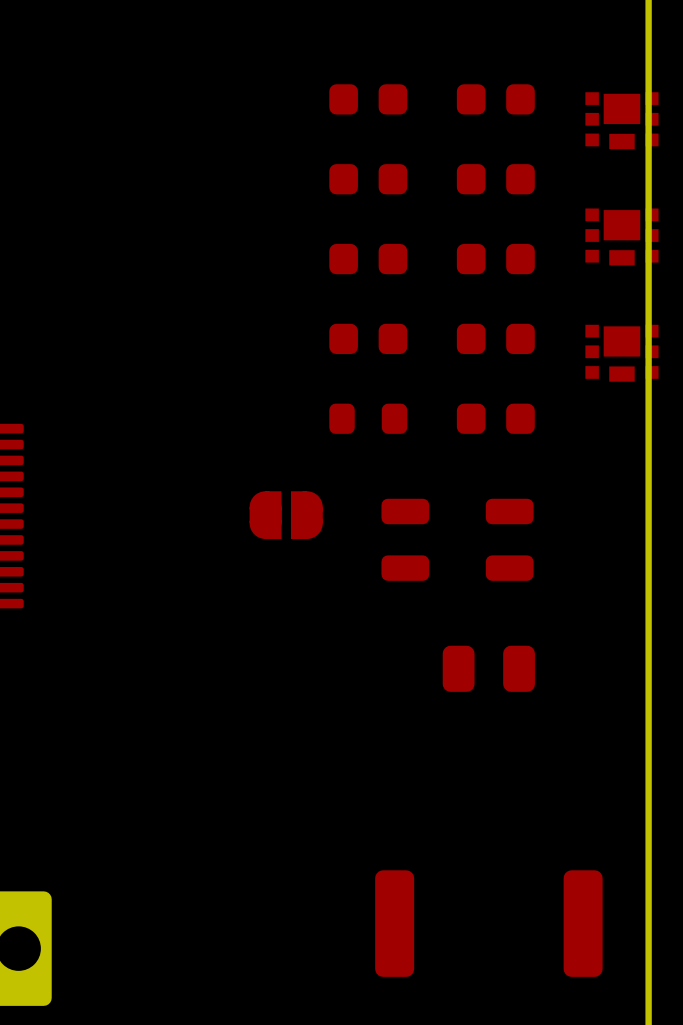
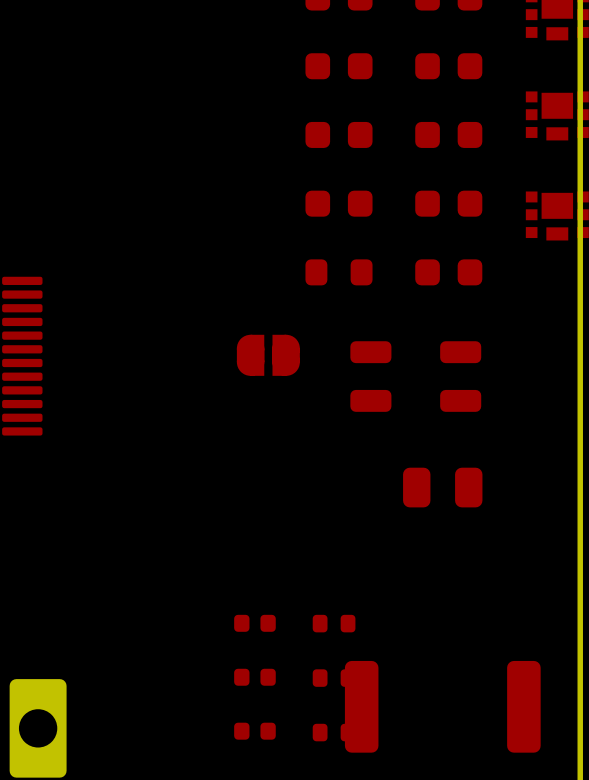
part: none -> (254, 623)
part: none -> (334, 623)
part: none -> (254, 677)
part: none -> (334, 678)
part: none -> (254, 731)
part: none -> (334, 732)

